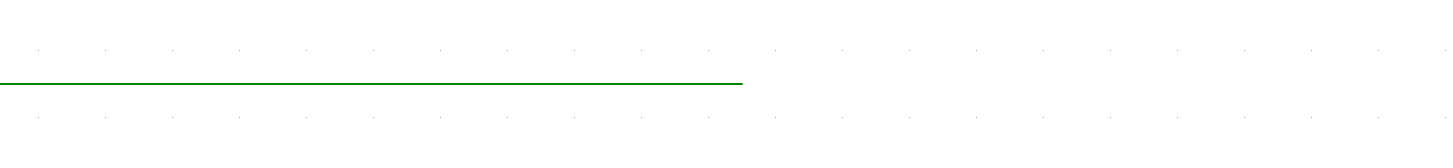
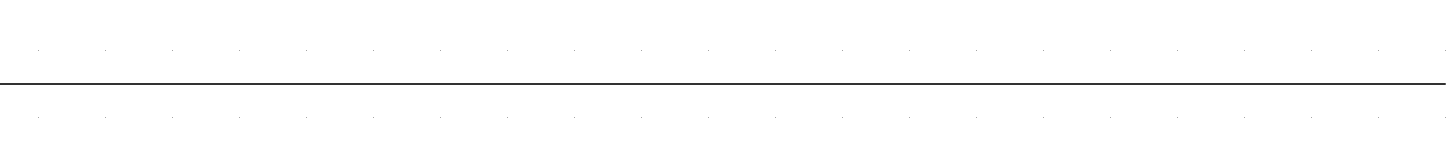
wire: none -> (741, 84) (1445, 84)

